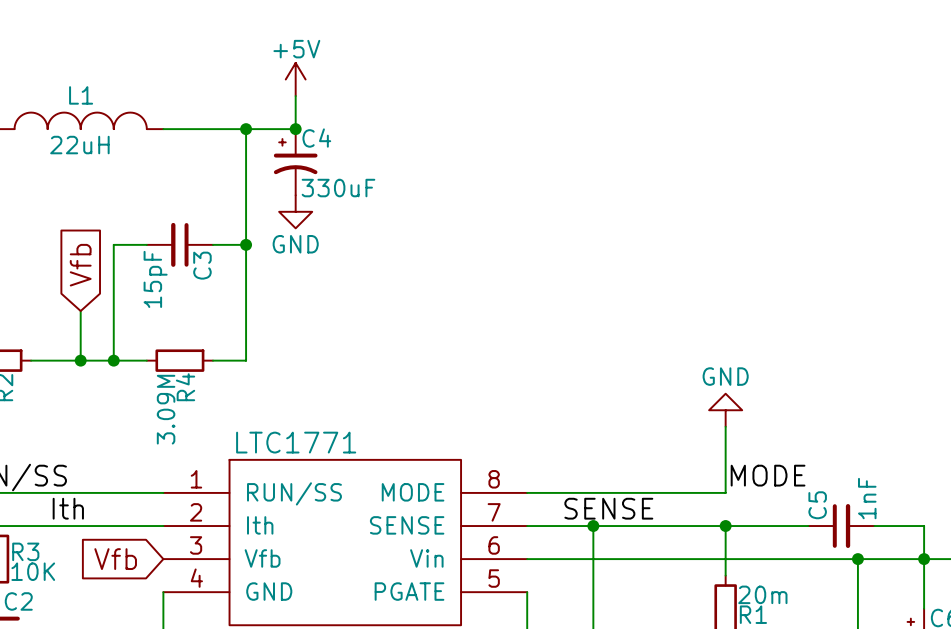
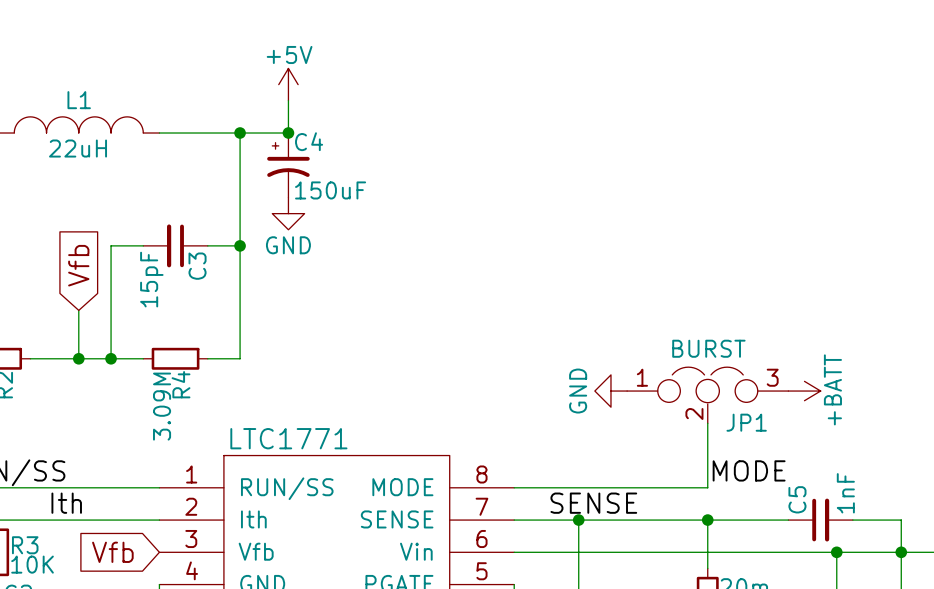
C4 value: 330uF (338, 188) -> 150uF (330, 190)
power symbol: none -> +BATT (804, 391)
JP1: none -> BURST (707, 395)
power symbol rotation: 0° (725, 410) -> 90° counterclockwise (610, 391)
power symbol position: GND (725, 410) -> GND (610, 391)

